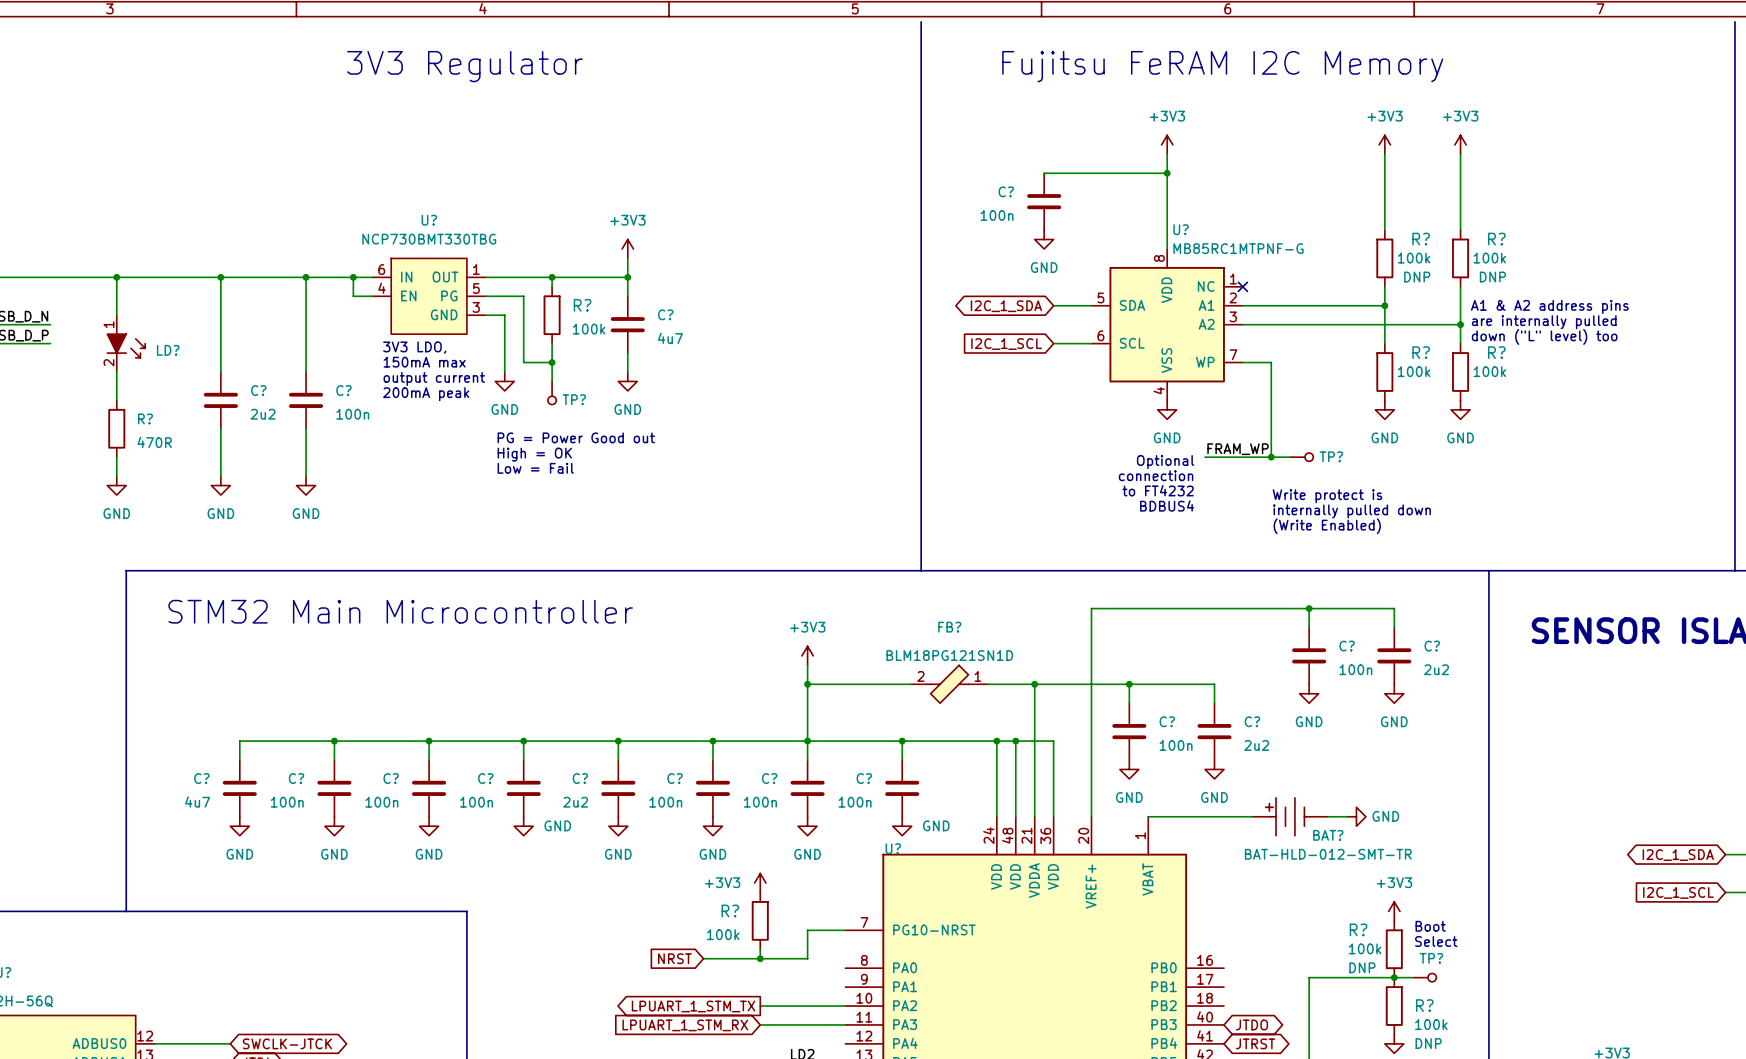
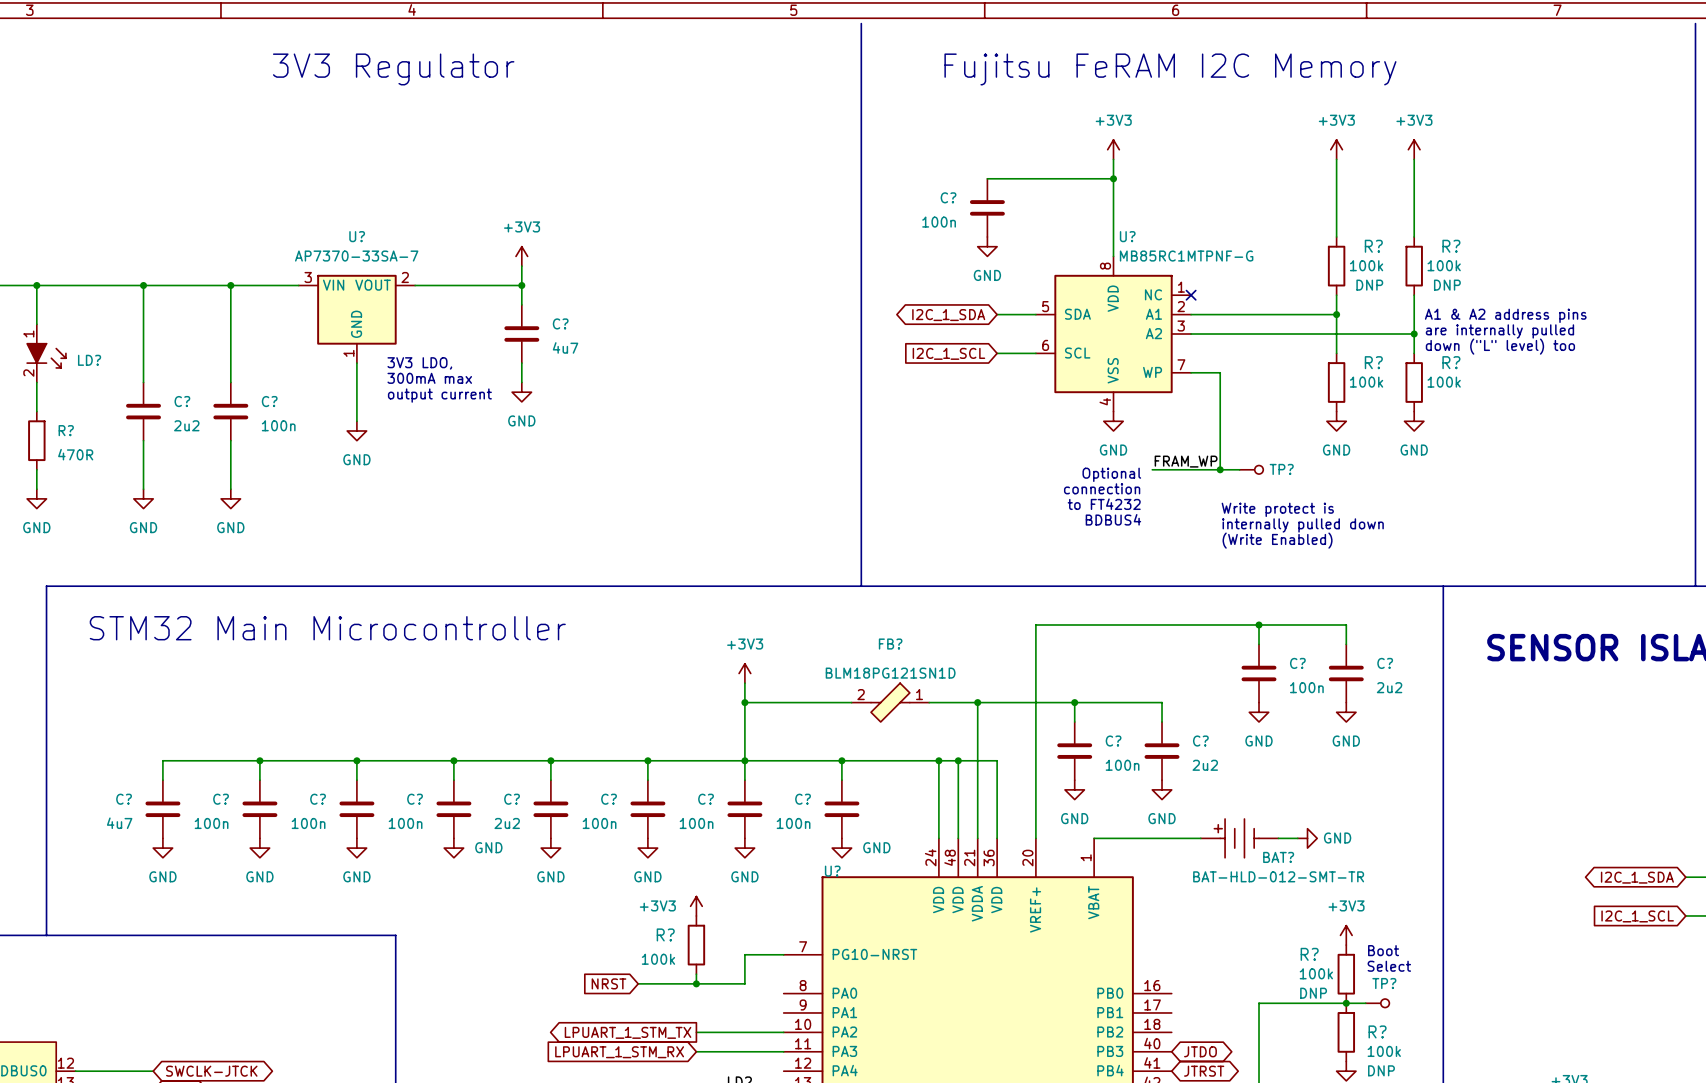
power symbol position: +3V3 (627, 248) -> +3V3 (521, 256)
wire: (627, 258) (627, 296) -> (521, 266) (521, 304)
wire: (353, 277) (353, 296) (372, 296) -> none
junction: (353, 277) -> none
wire: (552, 277) (552, 286) -> none
junction: (552, 277) -> none
wire: (589, 277) (627, 277) -> none
junction: none -> (521, 285)
junction: (627, 277) -> none
U?: NCP730BMT330TBG (429, 296) -> none
wire: (485, 296) (523, 296) (523, 362) (552, 362) -> none
U?: none -> AP7370-33SA-7 (356, 318)
wire: (485, 315) (504, 315) (504, 372) -> none
R?: (552, 315) -> none
C? position: (627, 324) -> (521, 334)
wire: (552, 343) (552, 381) -> none
text position: 3V3 LDO, (414, 347) -> 3V3 LDO, (419, 363)
wire: none -> (356, 363) (356, 421)
wire: (627, 353) (627, 372) -> (521, 363) (521, 382)
text: 150mA max (424, 362) -> 300mA max (429, 378)
junction: (552, 362) -> none
text position: output current (434, 378) -> output current (439, 395)
power symbol: GND (504, 381) -> none
power symbol position: GND (627, 381) -> GND (521, 392)
TP?: (552, 393) -> none
text: 200mA peak (426, 394) -> none
power symbol: none -> GND (356, 430)
text: PG = Power Good out (576, 437) -> none
text: High = OK (534, 454) -> none
text: Low = Fail (535, 468) -> none

